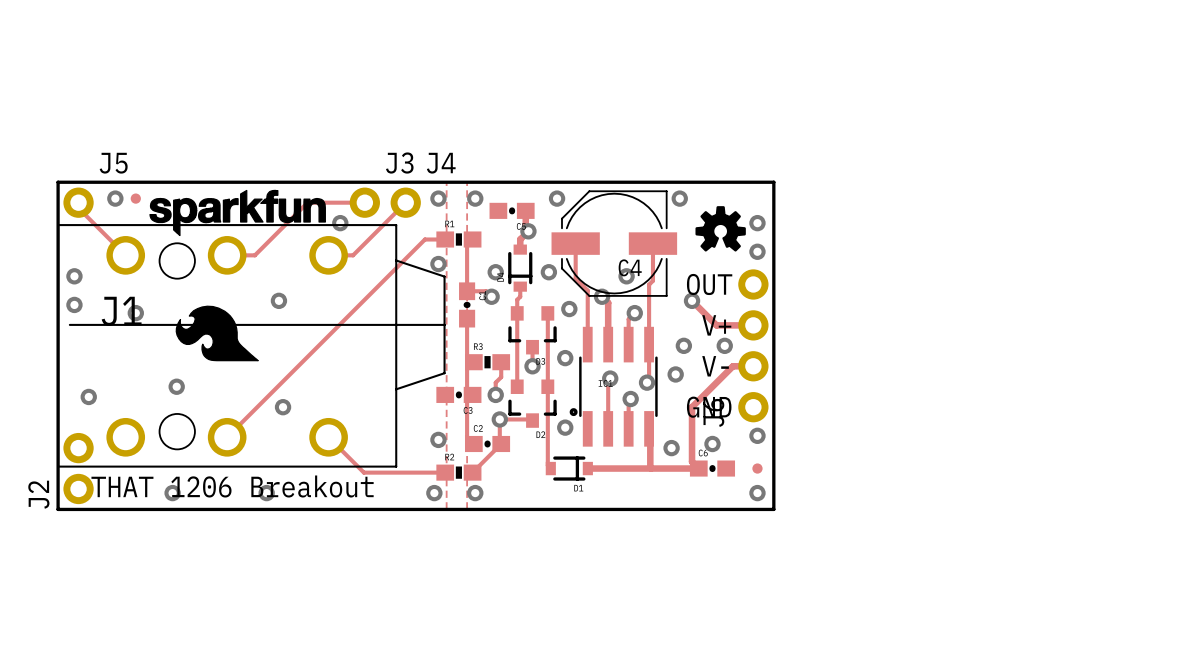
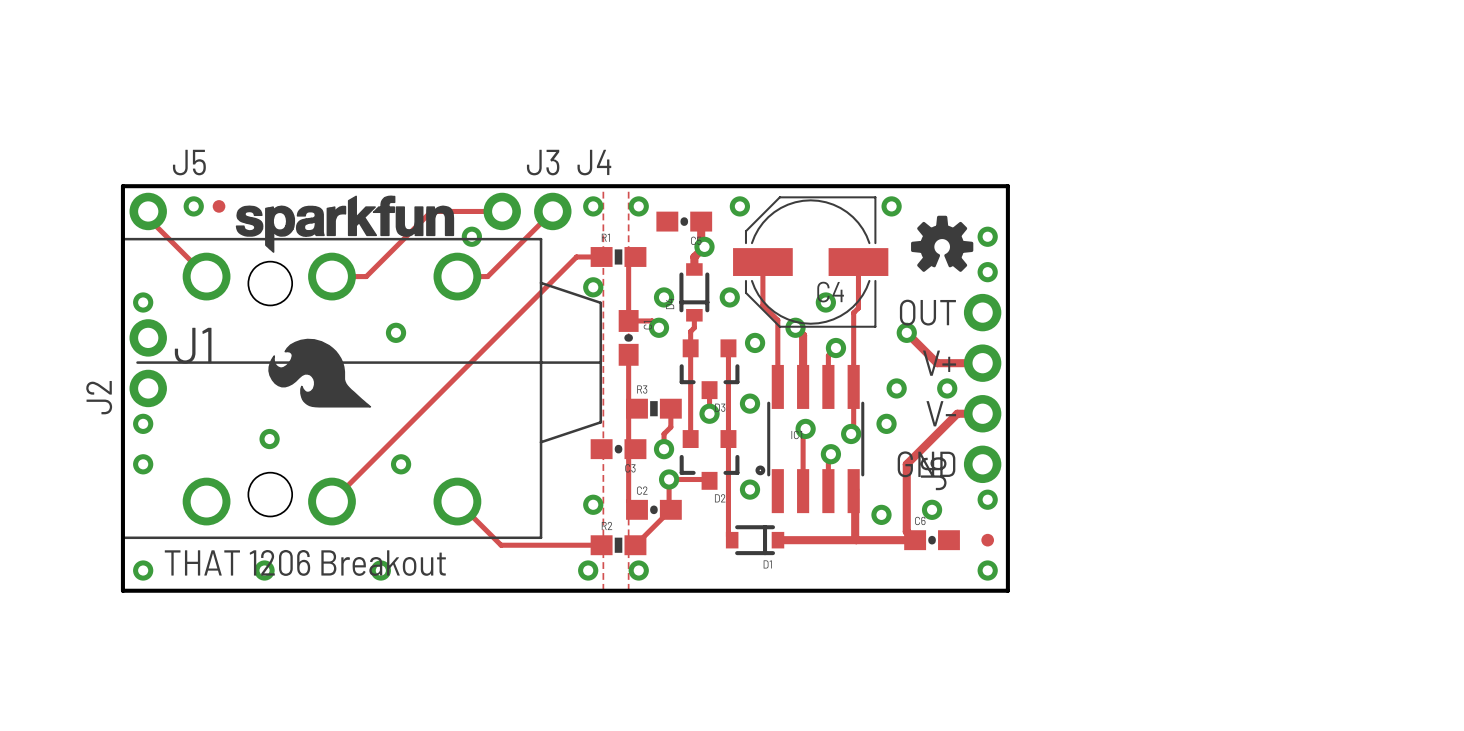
via: (74, 304) -> none
via: (135, 313) -> none
via: none -> (143, 423)
via: (88, 396) -> none
via: none -> (143, 464)
J2 position: (78, 468) -> (148, 363)
via: none -> (143, 570)

